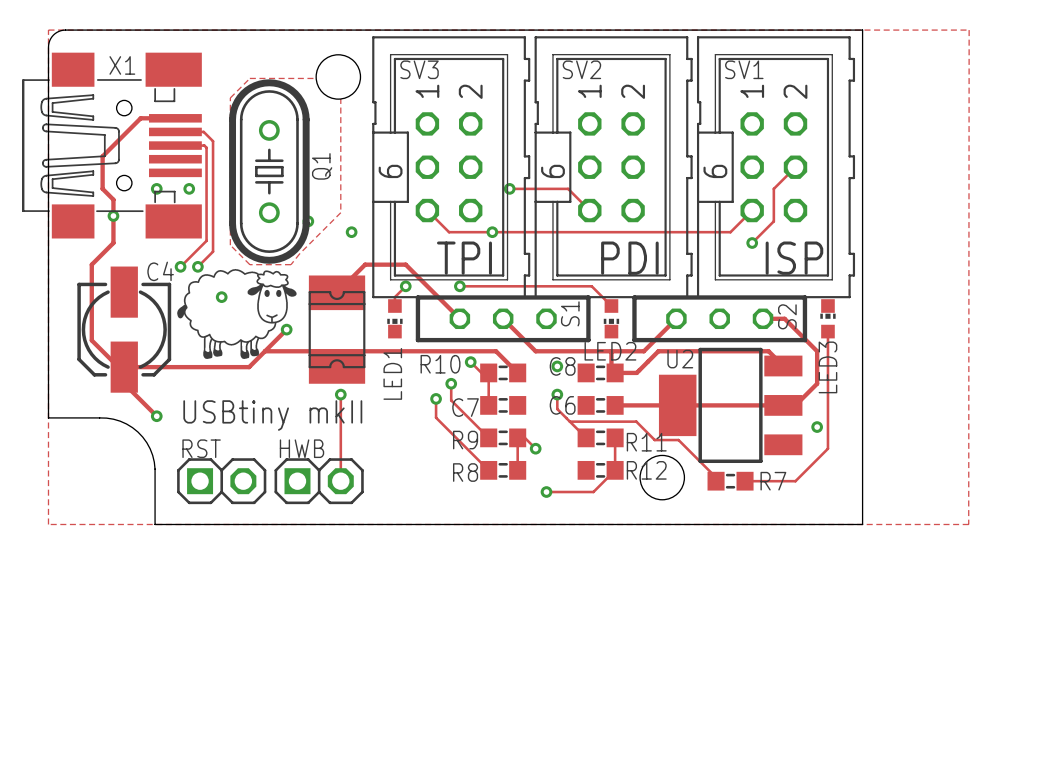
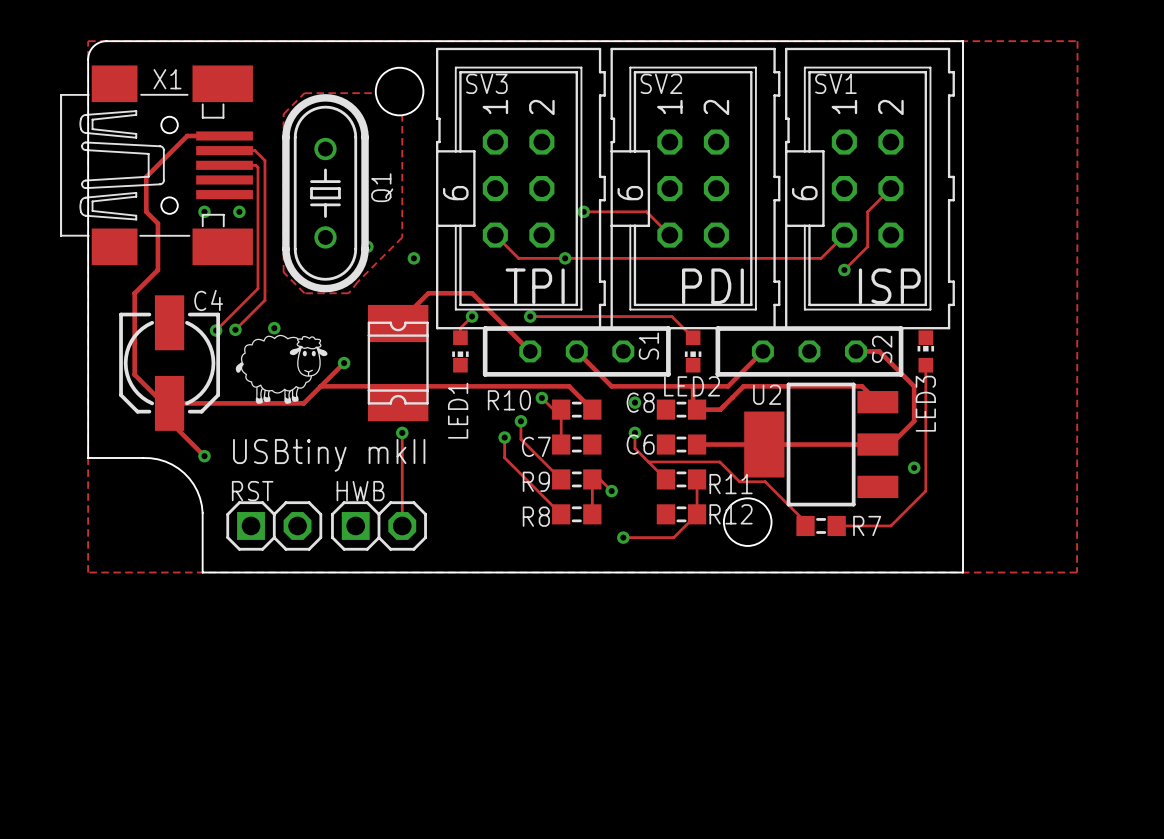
via: (113, 215) -> none
track: (206, 240) (180, 266) -> (258, 267) (258, 288) (216, 330)
track: (213, 251) (197, 266) -> (264, 279) (264, 300) (235, 329)
via: (180, 266) -> none
via: (197, 266) -> none
drawing: [177, 268, 297, 359] -> none
via: none -> (235, 329)
via: none -> (216, 330)
drawing: none -> [235, 334, 328, 404]

